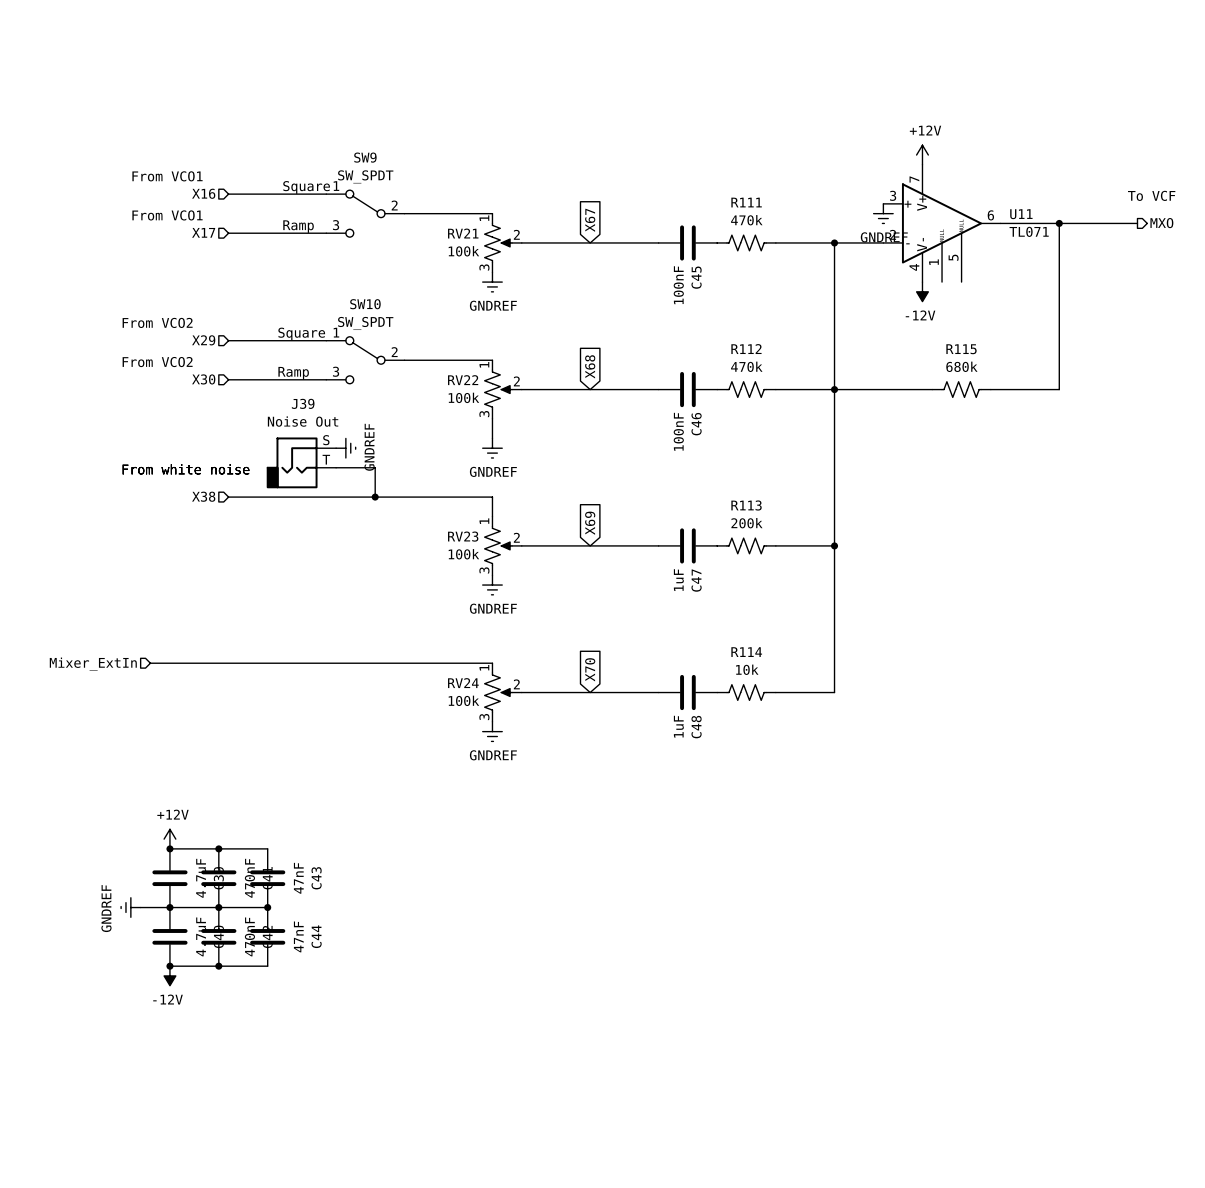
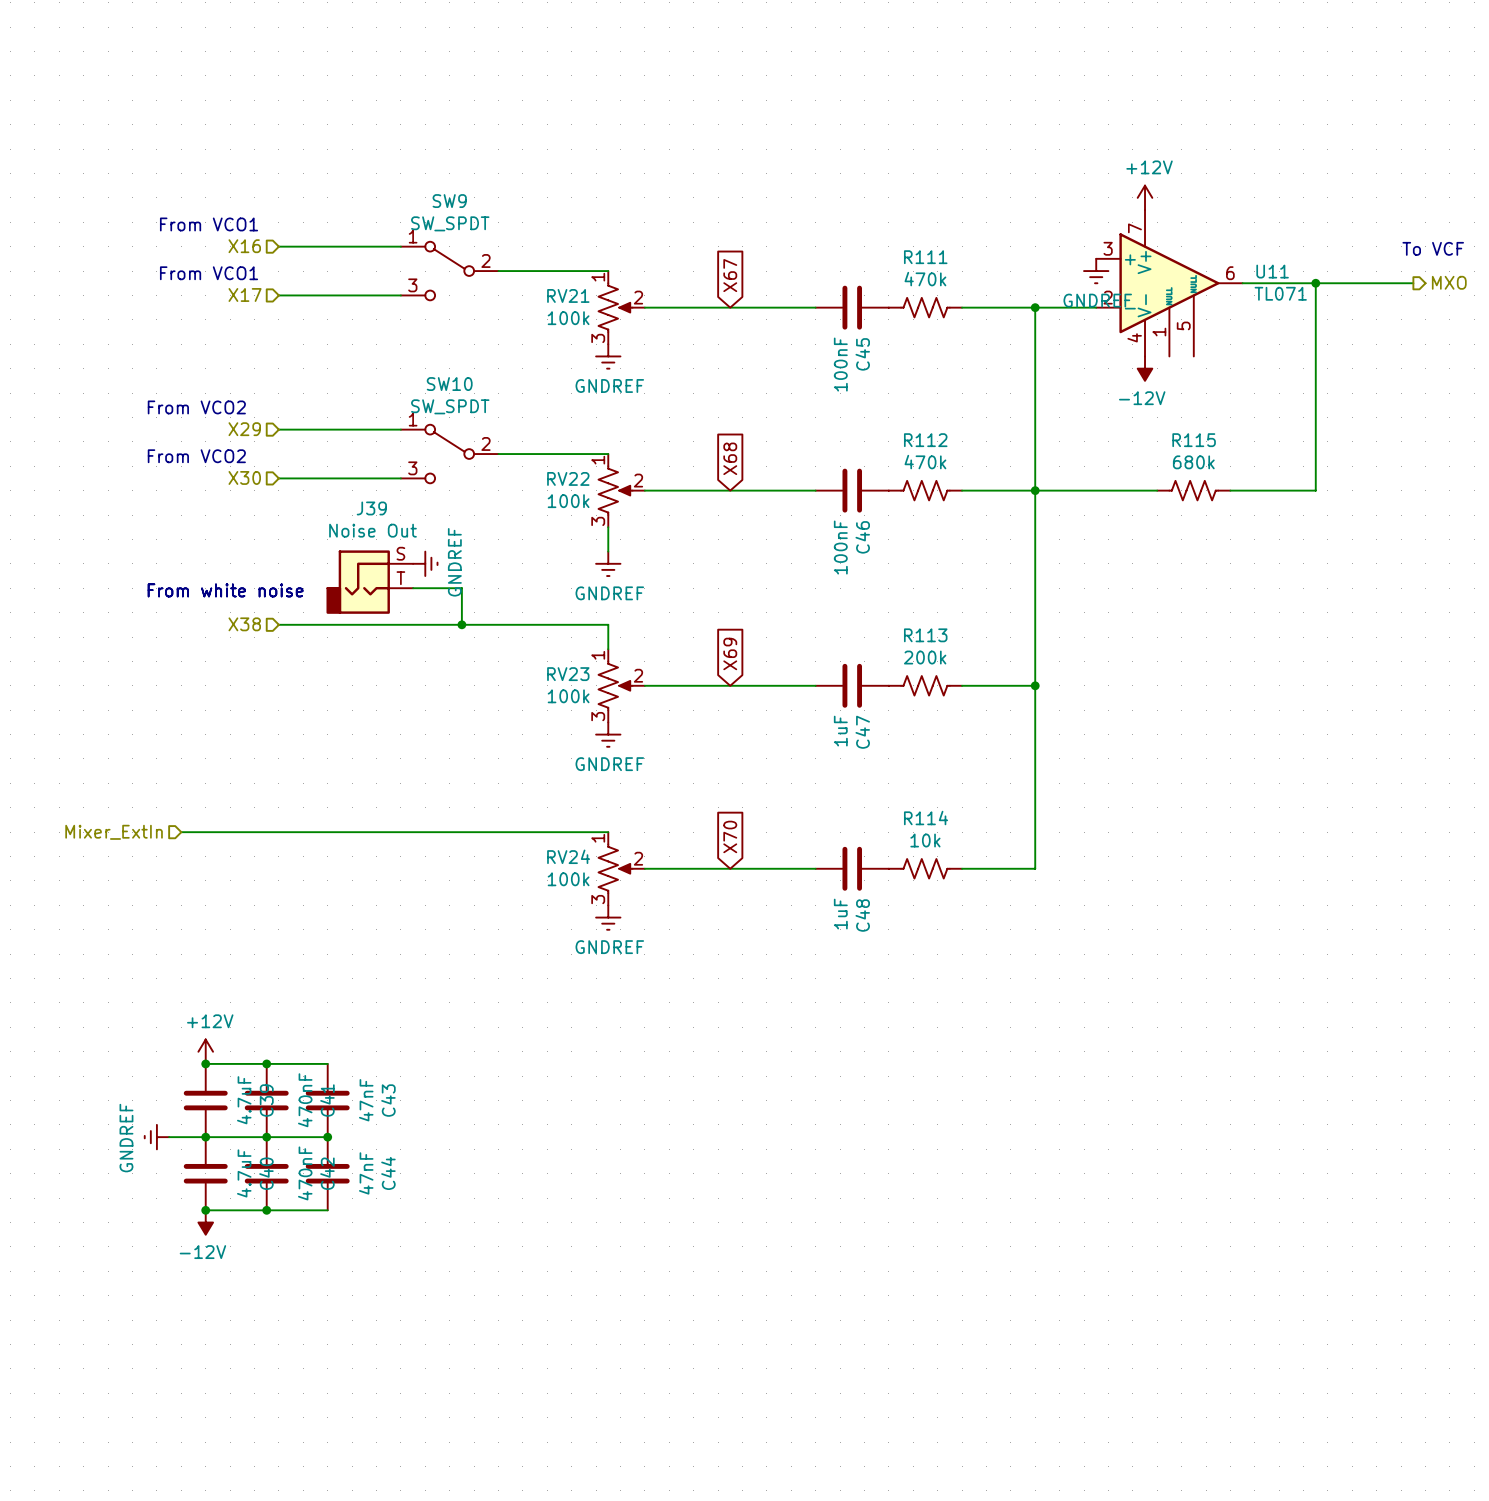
text: Square (306, 187) -> none
text: Ramp (298, 226) -> none
text: Square (301, 334) -> none
text: Ramp (293, 373) -> none

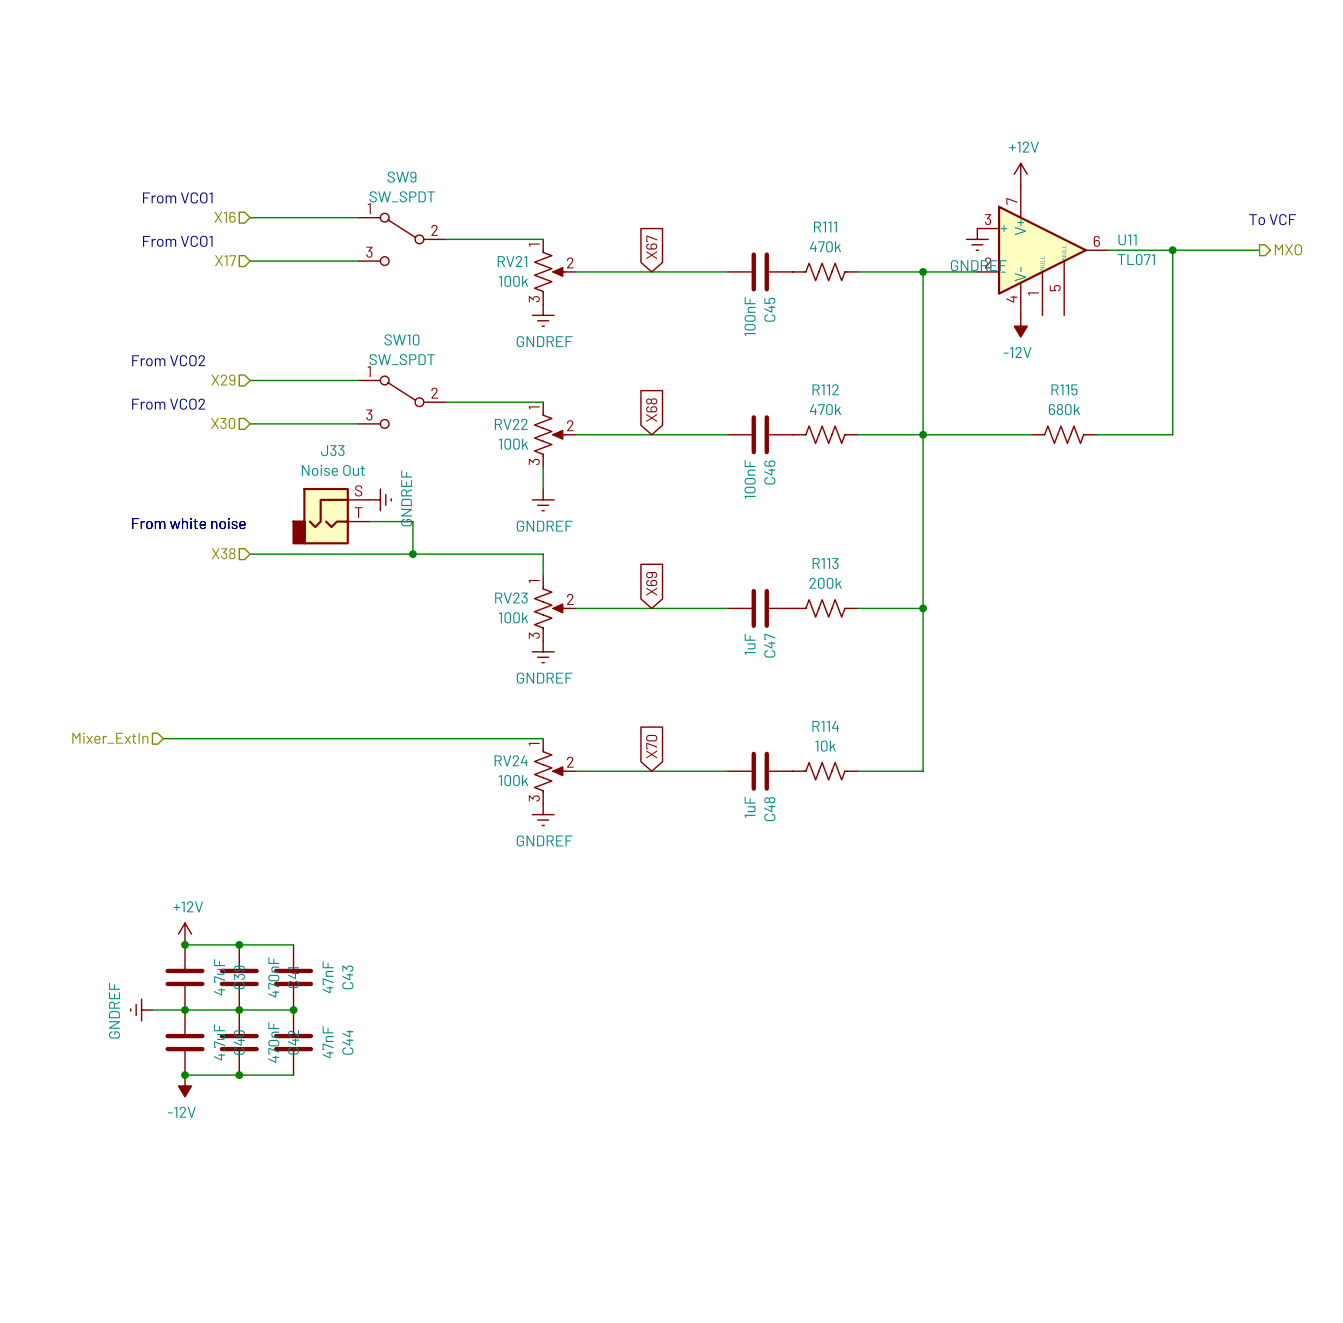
J39 name: J39 (371, 508) -> J33 (332, 450)

